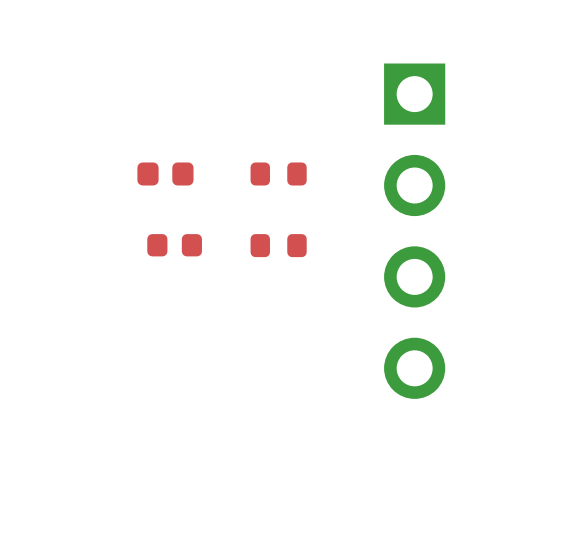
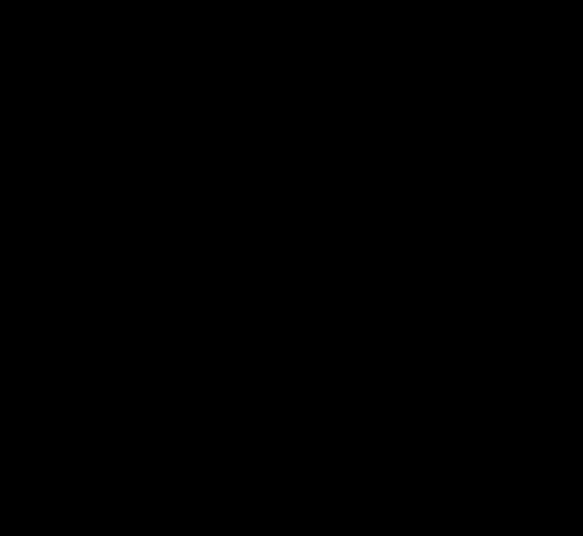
part: (165, 173) -> none
part: (278, 173) -> none
part: (414, 231) -> none
part: (174, 245) -> none
part: (278, 245) -> none

